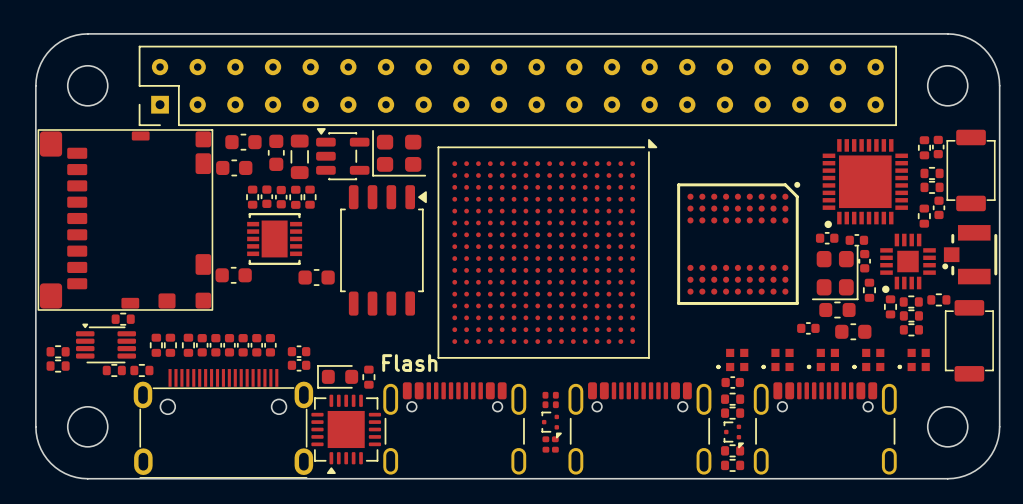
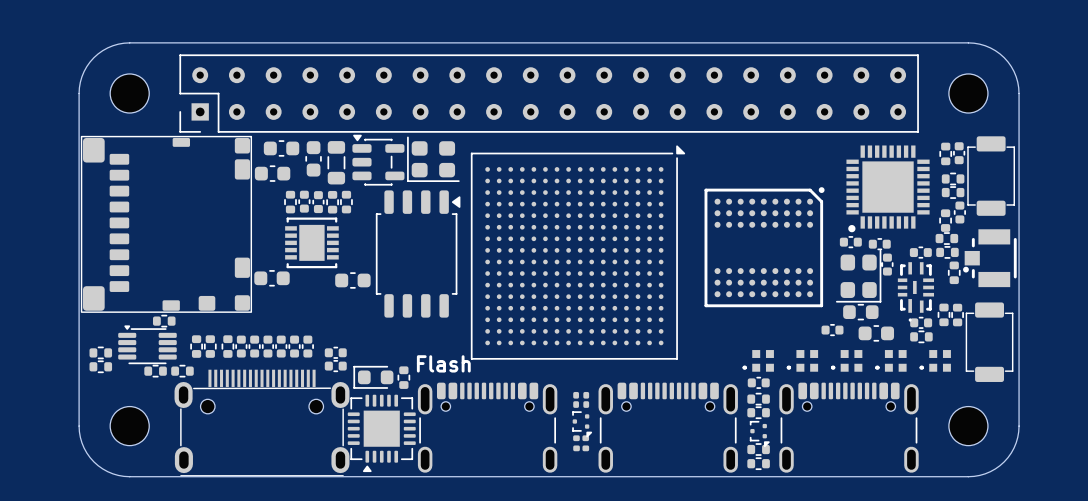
part: none -> (946, 238)
part: none -> (920, 252)
part: none -> (947, 252)
part: (908, 263) -> none
part: none -> (954, 272)
part: none -> (915, 291)
part: (869, 290) -> none
part: (938, 299) -> none
part: (911, 301) -> none
part: (890, 306) -> none
part: none -> (943, 314)
part: none -> (957, 315)
part: (911, 315) -> none
part: none -> (921, 322)
part: (911, 329) -> none
part: none -> (921, 336)

